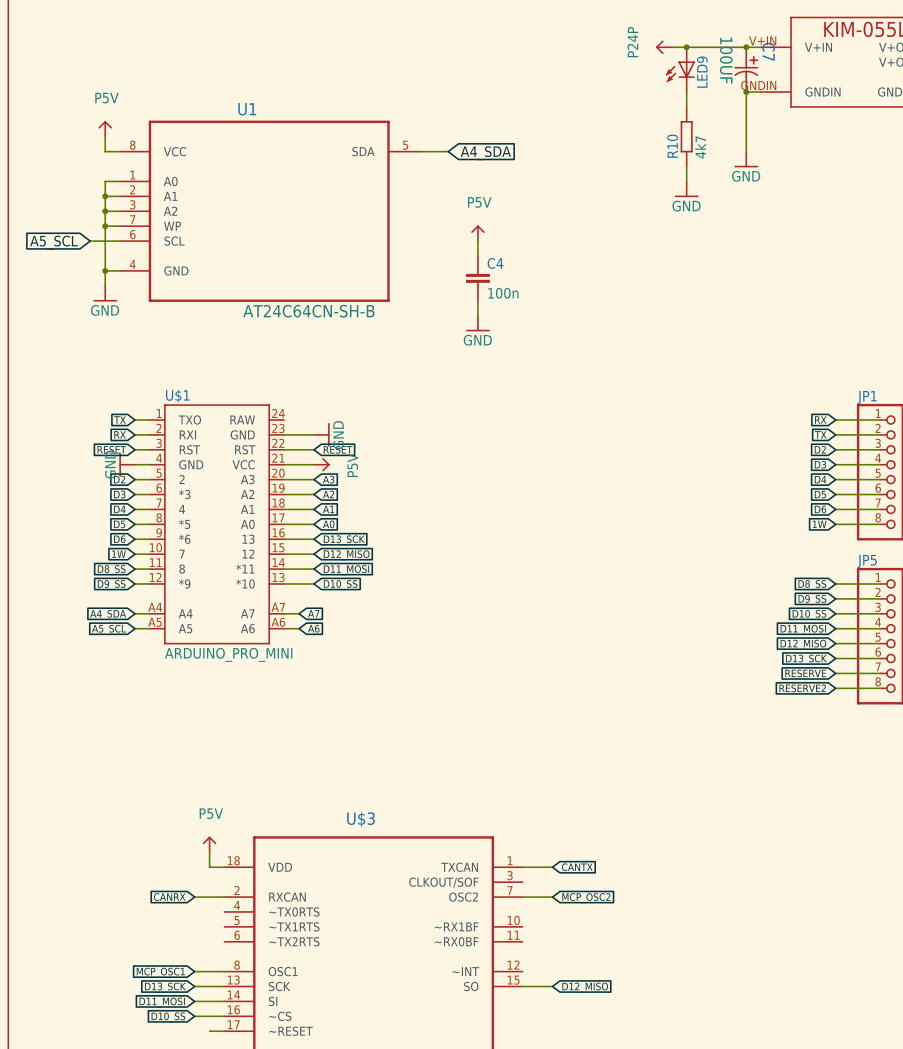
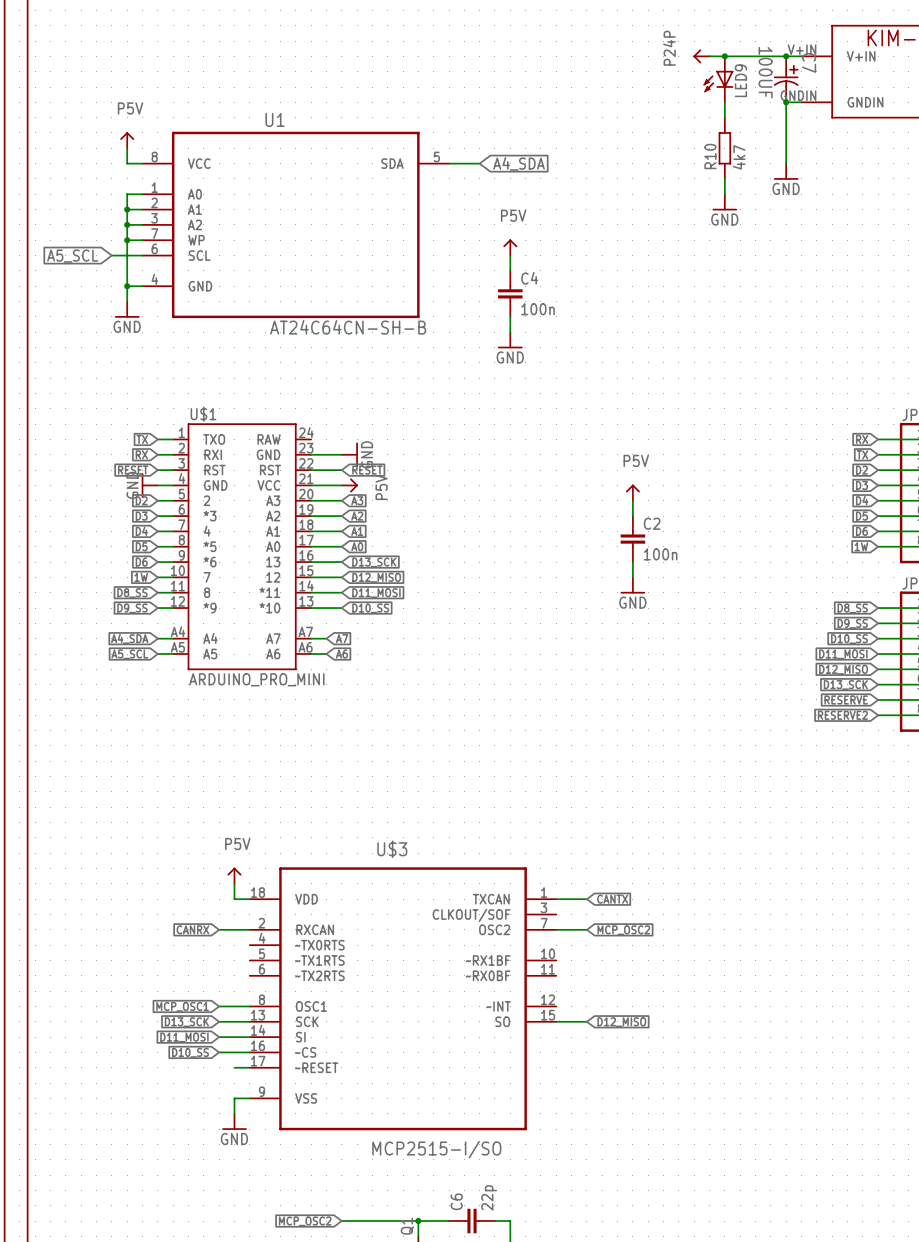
power symbol: none -> P5V (632, 492)
wire: none -> (632, 500) (632, 516)
C2: none -> 100n (632, 539)
wire: none -> (632, 562) (632, 577)
power symbol: none -> GND (632, 585)

